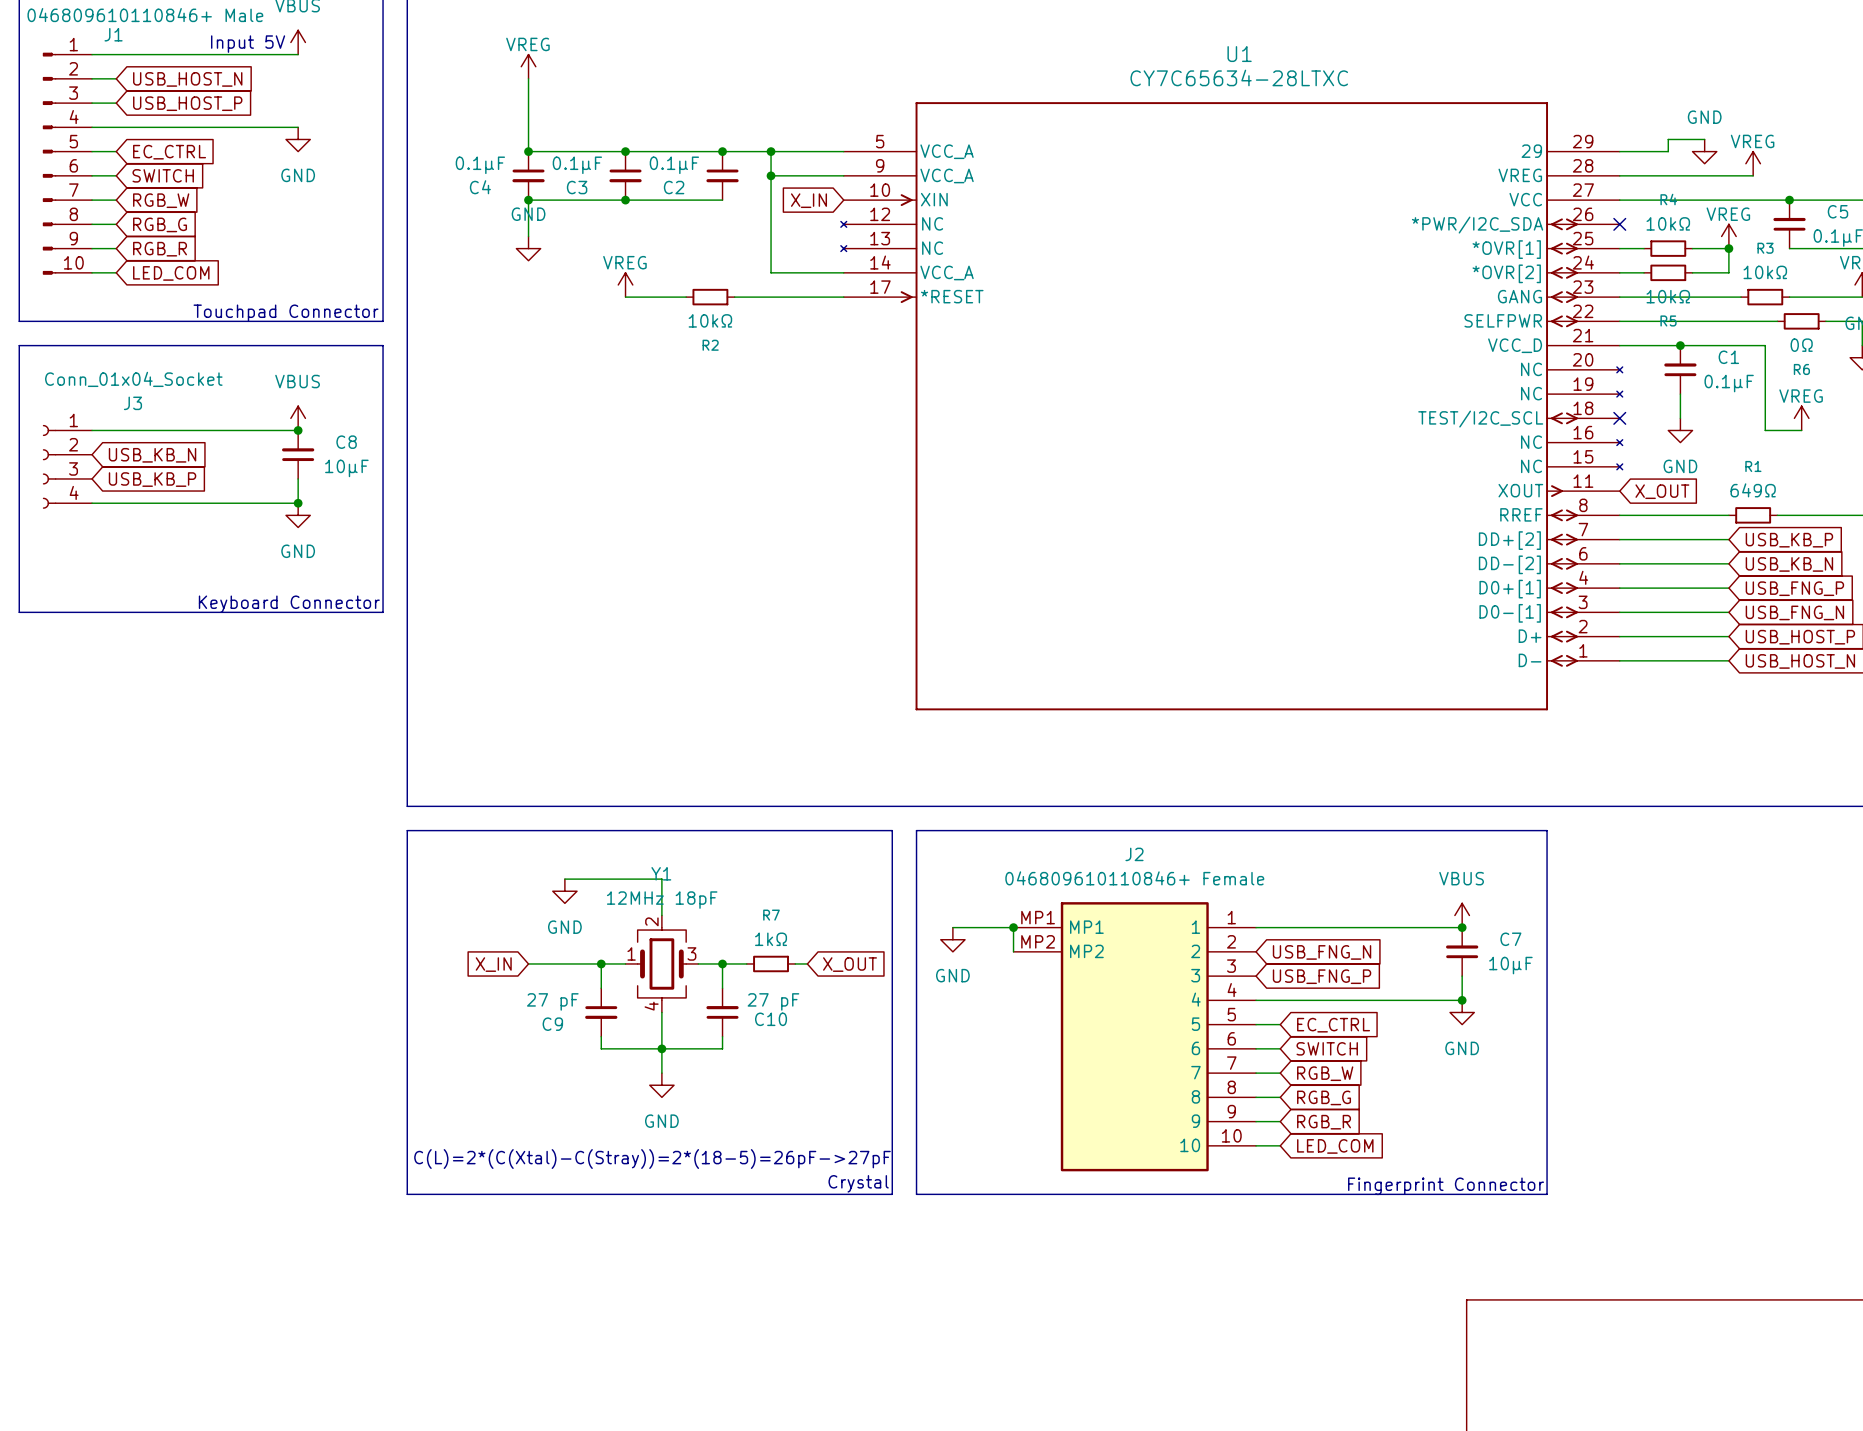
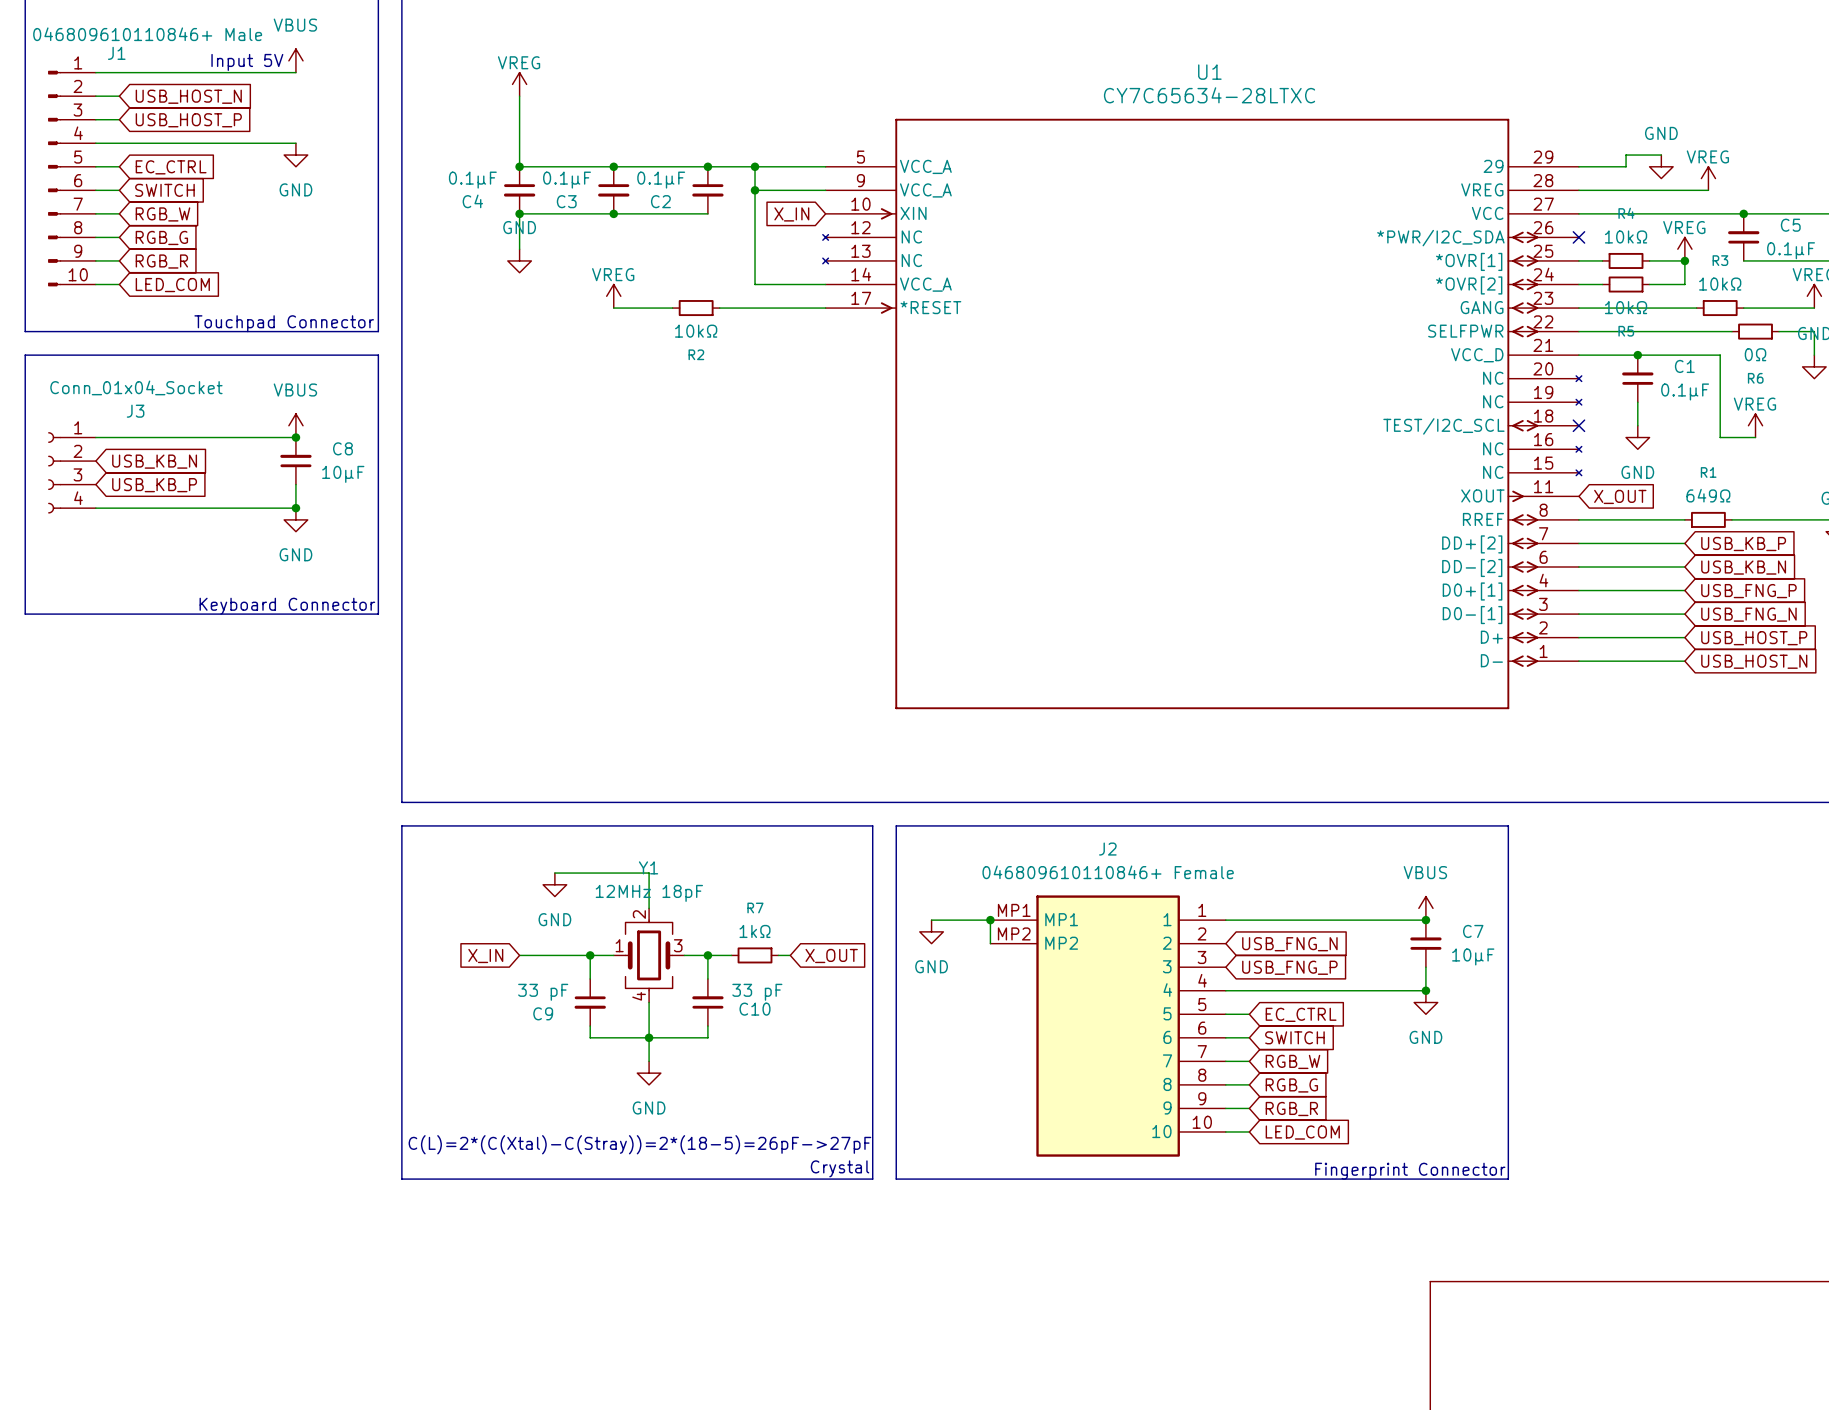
C9 value: 27 pF (552, 1001) -> 33 pF (543, 992)
C10 value: 27 pF (773, 1001) -> 33 pF (757, 992)

